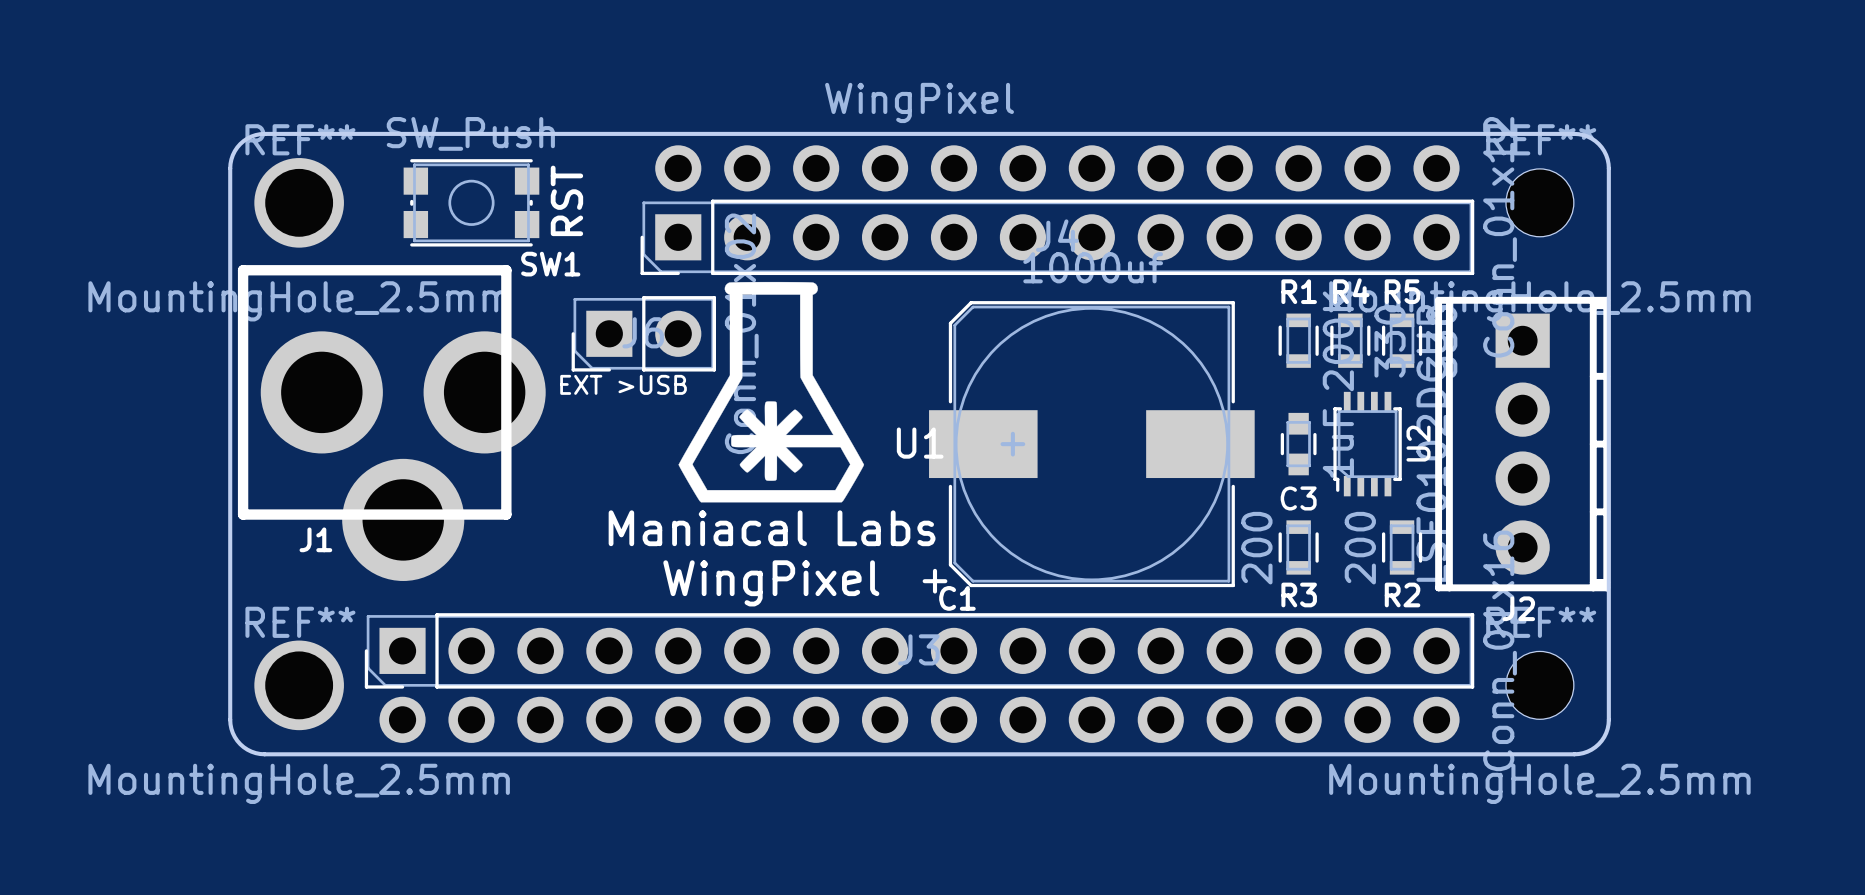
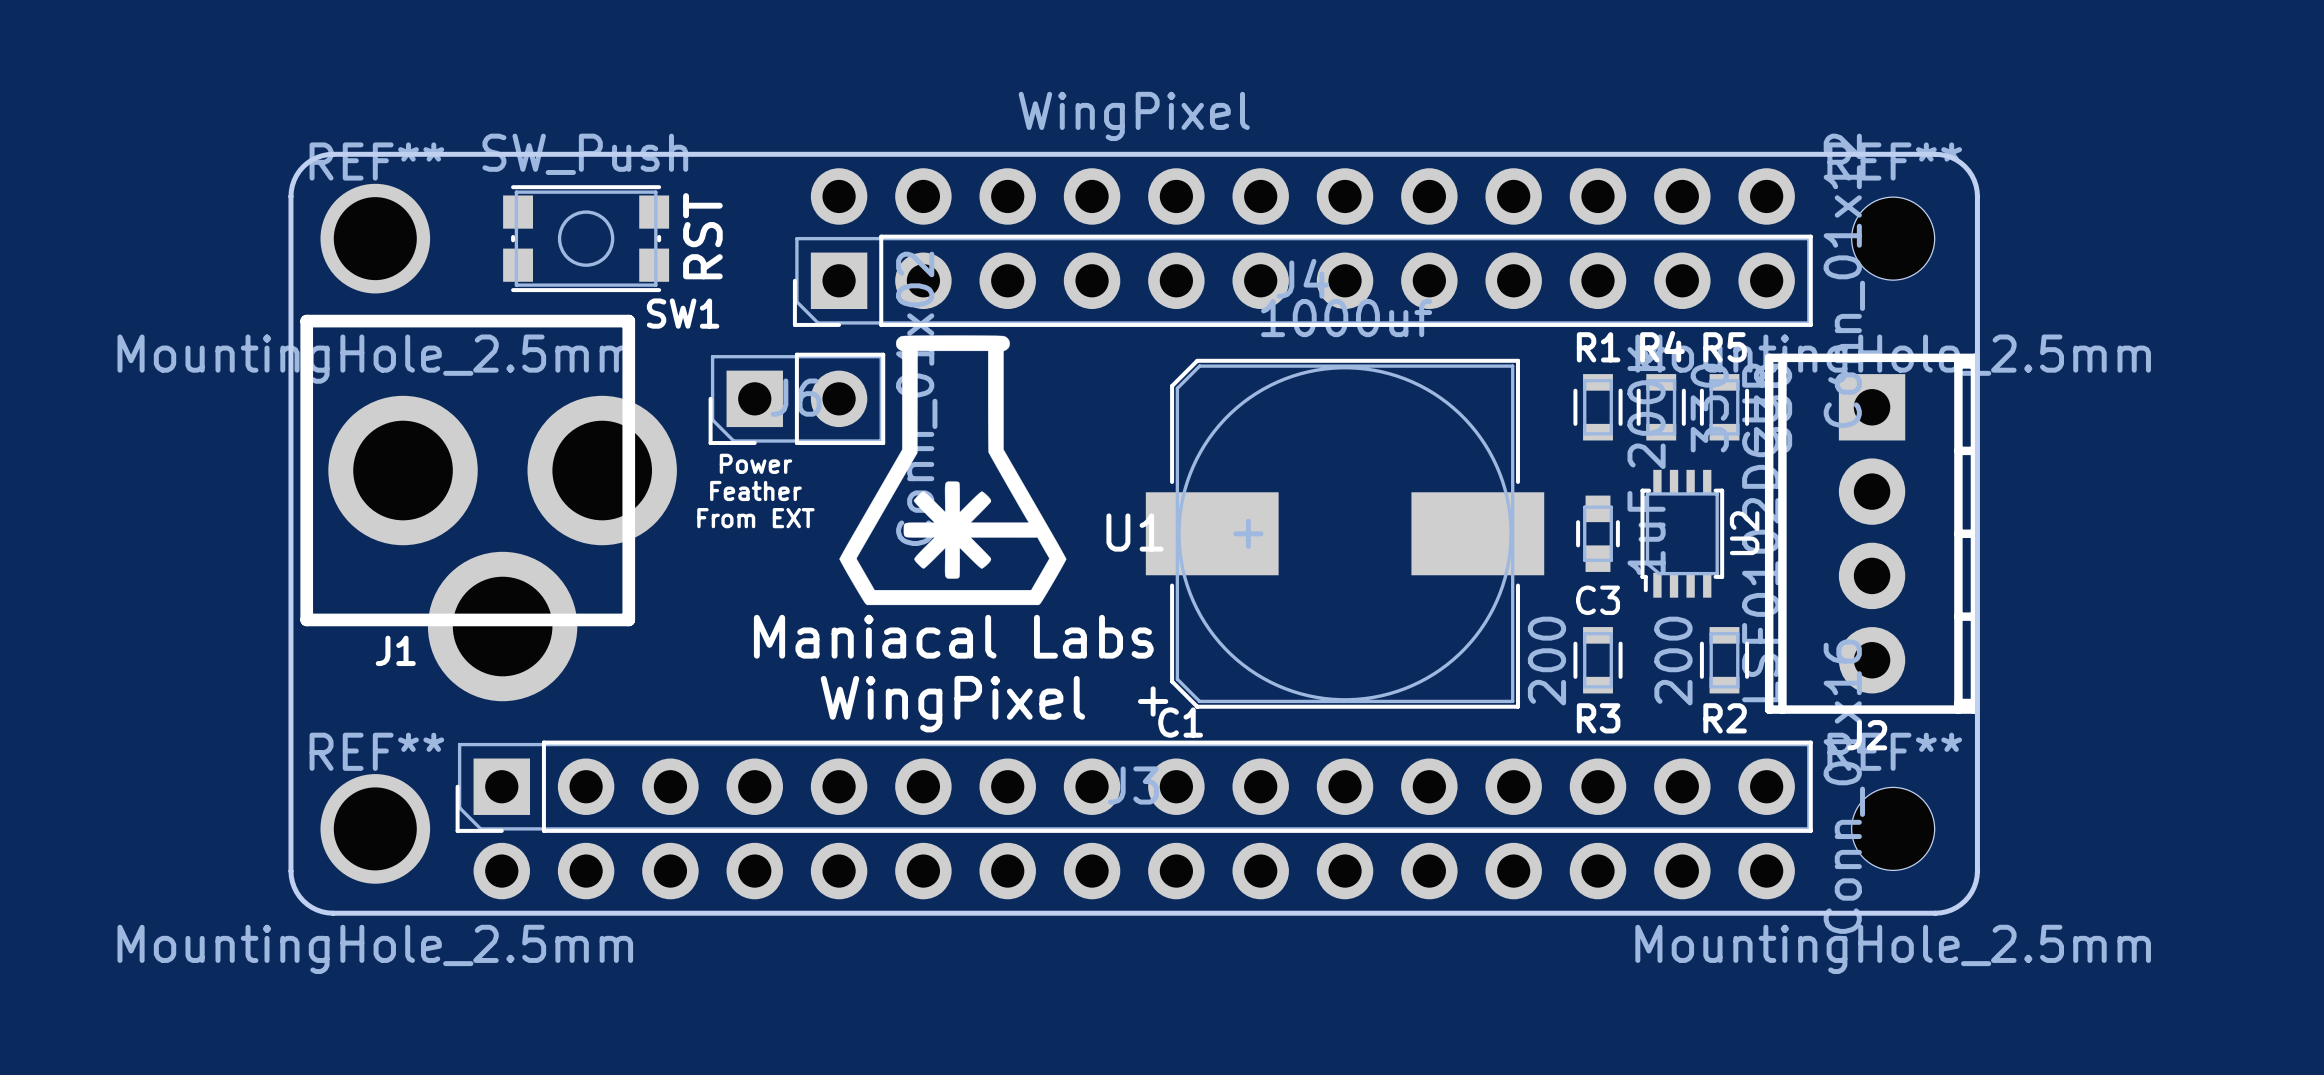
text: EXT >USB (623, 384) -> none
text: none -> Power (755, 463)
text: none -> Feather (755, 490)
text: none -> From EXT (755, 518)

